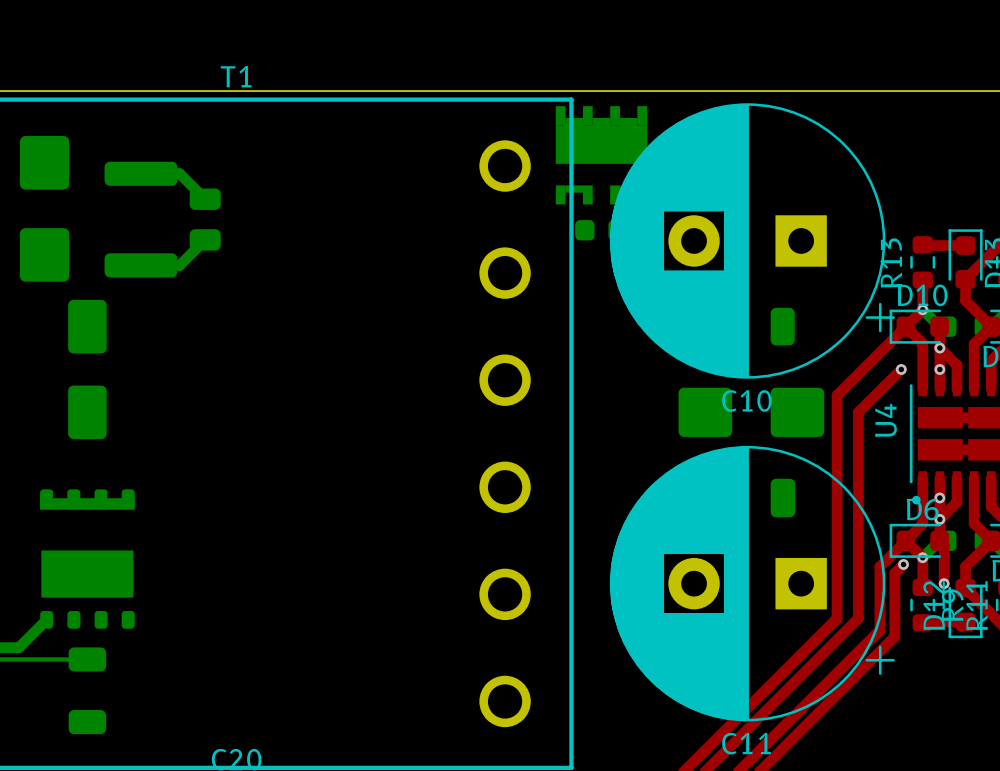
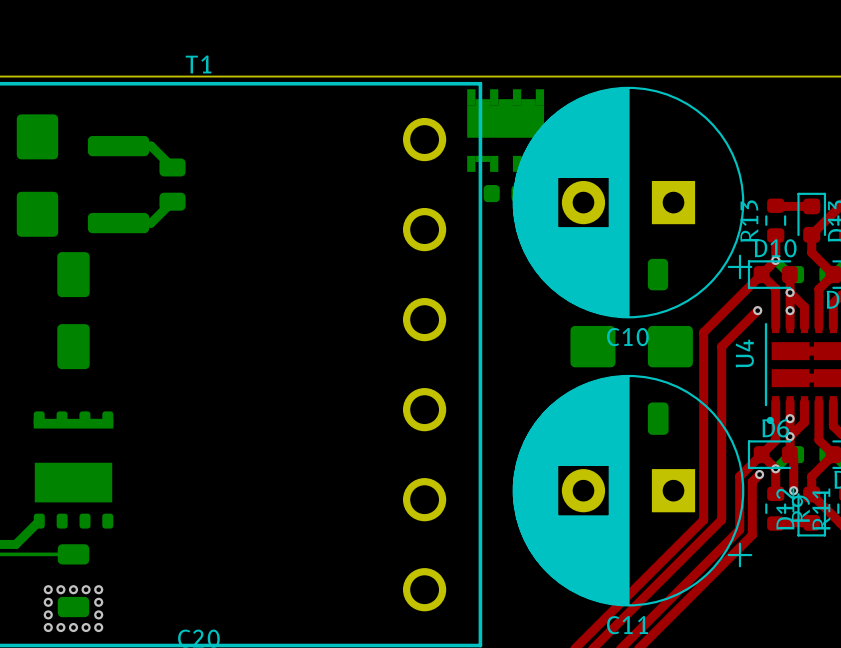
via: none -> (48, 589)
via: none -> (60, 589)
via: none -> (73, 589)
via: none -> (86, 589)
via: none -> (98, 589)
via: none -> (48, 602)
via: none -> (98, 602)
via: none -> (48, 614)
via: none -> (98, 614)
via: none -> (48, 627)
via: none -> (60, 627)
via: none -> (73, 627)
via: none -> (86, 627)
via: none -> (98, 627)

